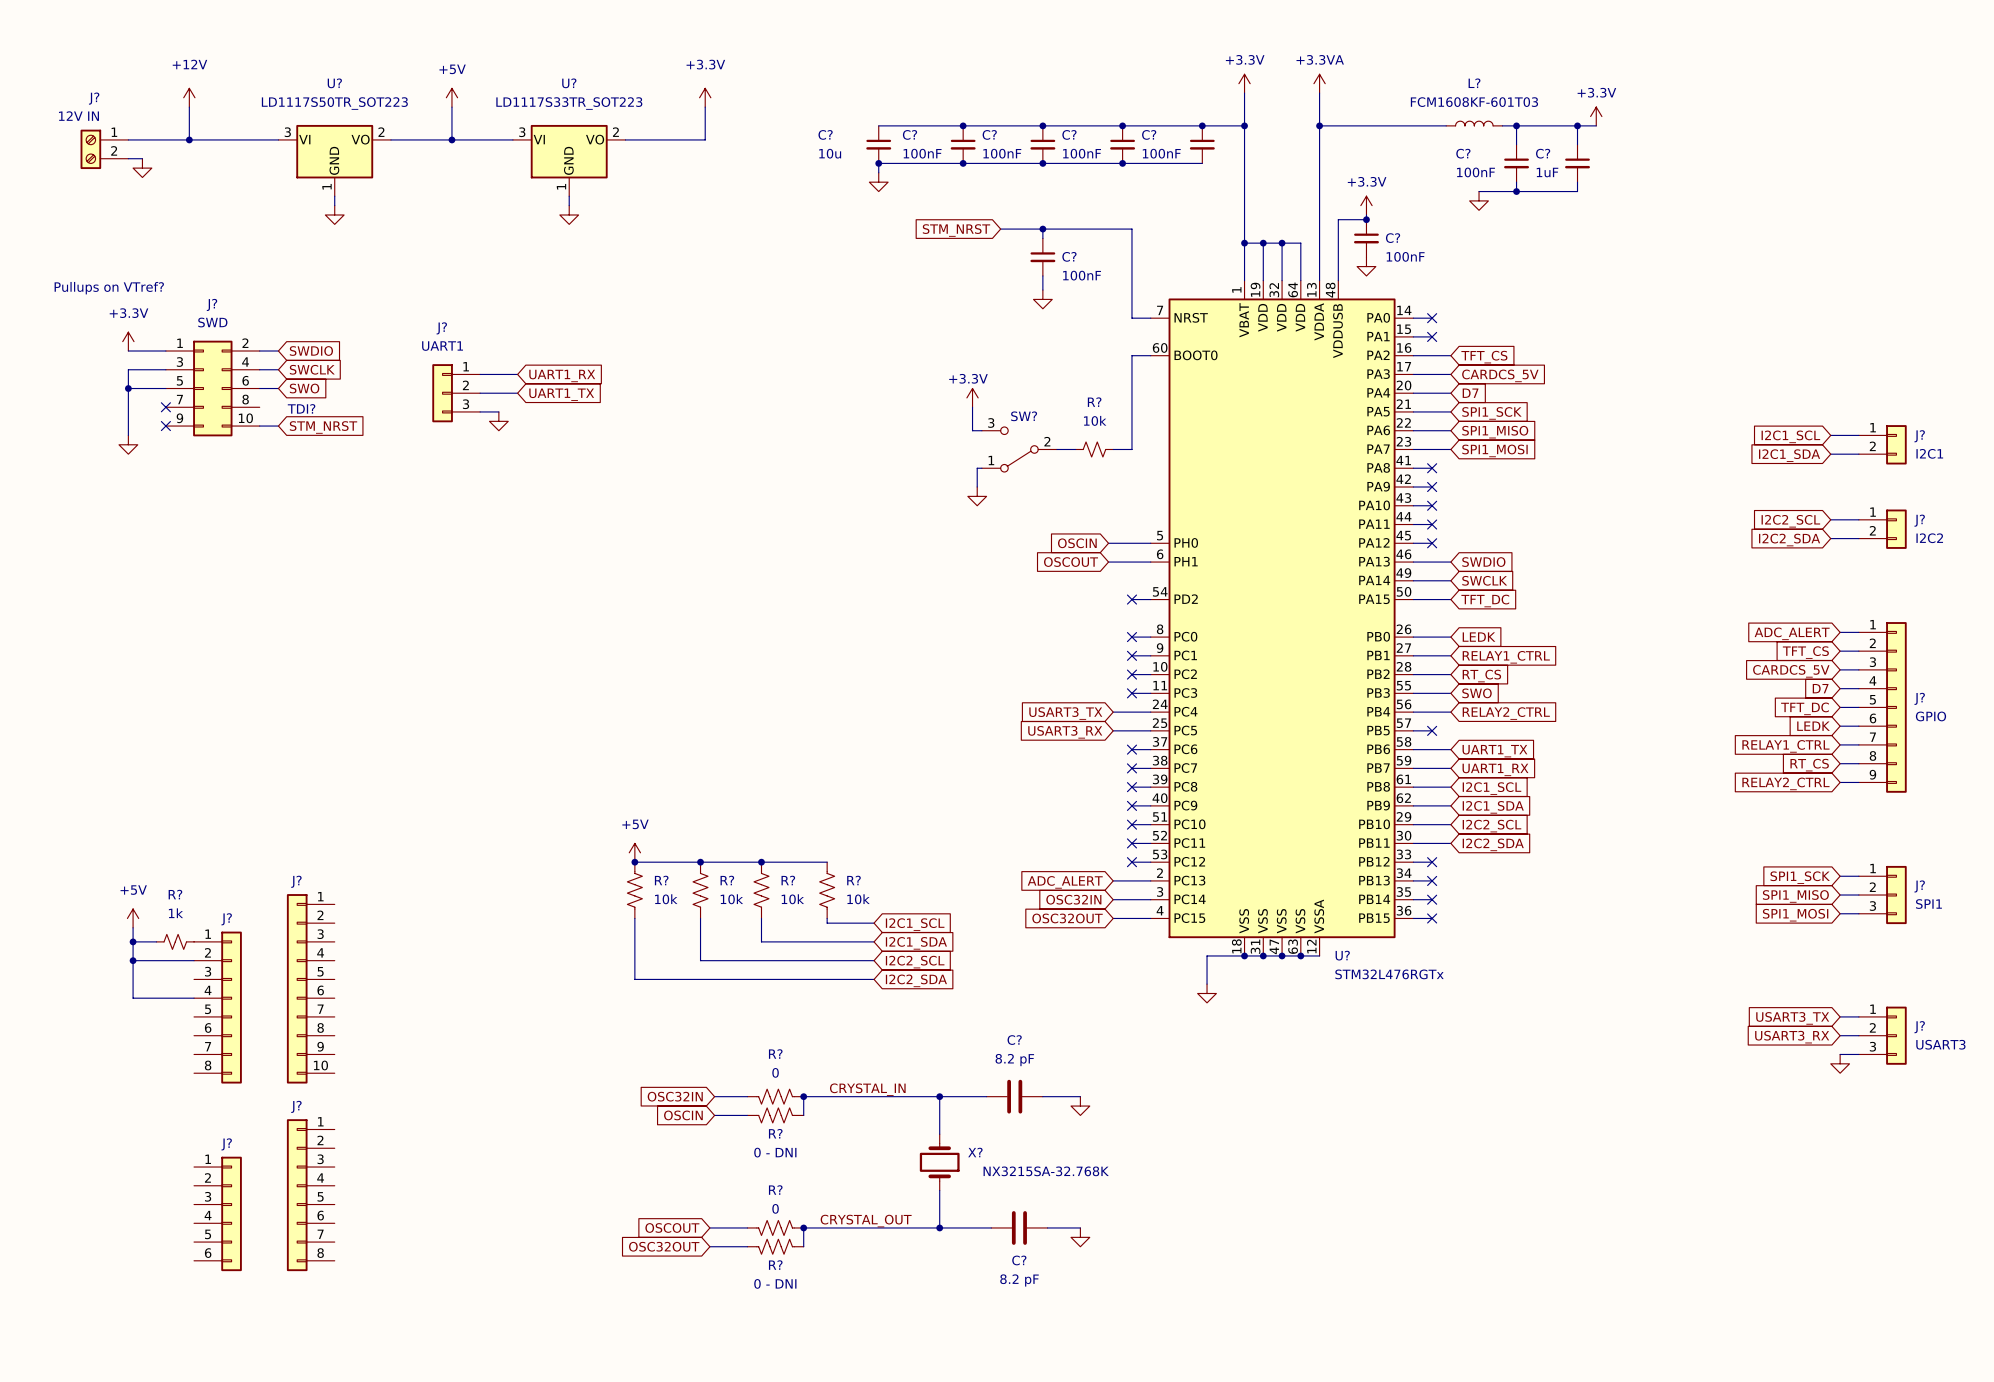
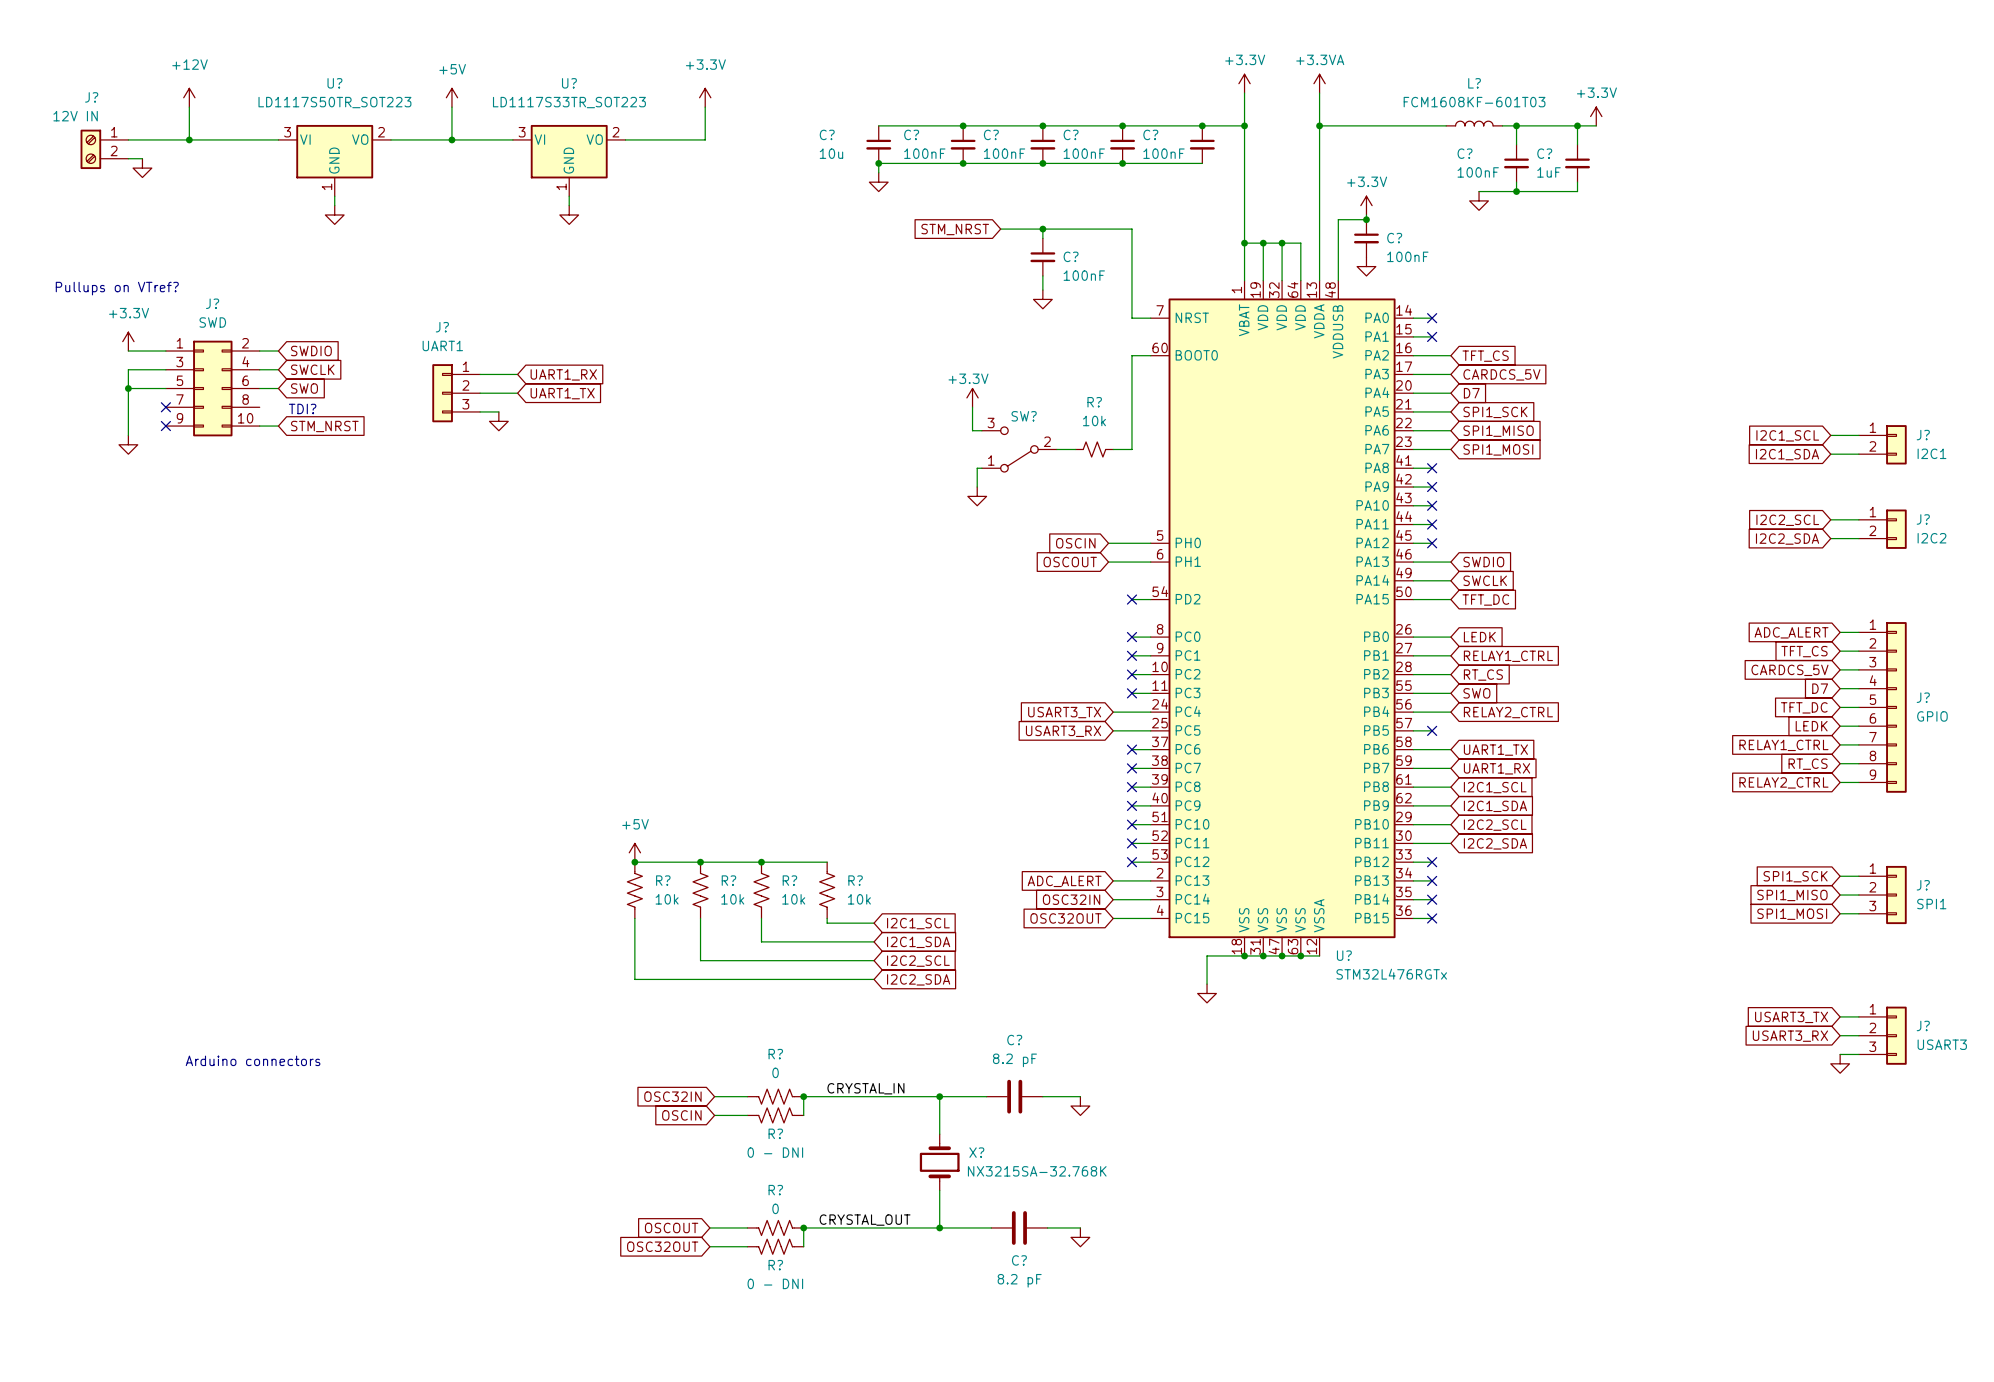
power symbol: +5V (133, 918) -> none
wire: (133, 927) (133, 998) (194, 998) -> none
wire: (133, 941) (156, 941) -> none
junction: (133, 941) -> none
R?: 1k (175, 941) -> none
wire: (133, 960) (194, 960) -> none
junction: (133, 960) -> none
J?: (310, 988) -> none
J?: (217, 1007) -> none
text: none -> Arduino connectors (253, 1060)
J?: (310, 1195) -> none
J?: (217, 1213) -> none

